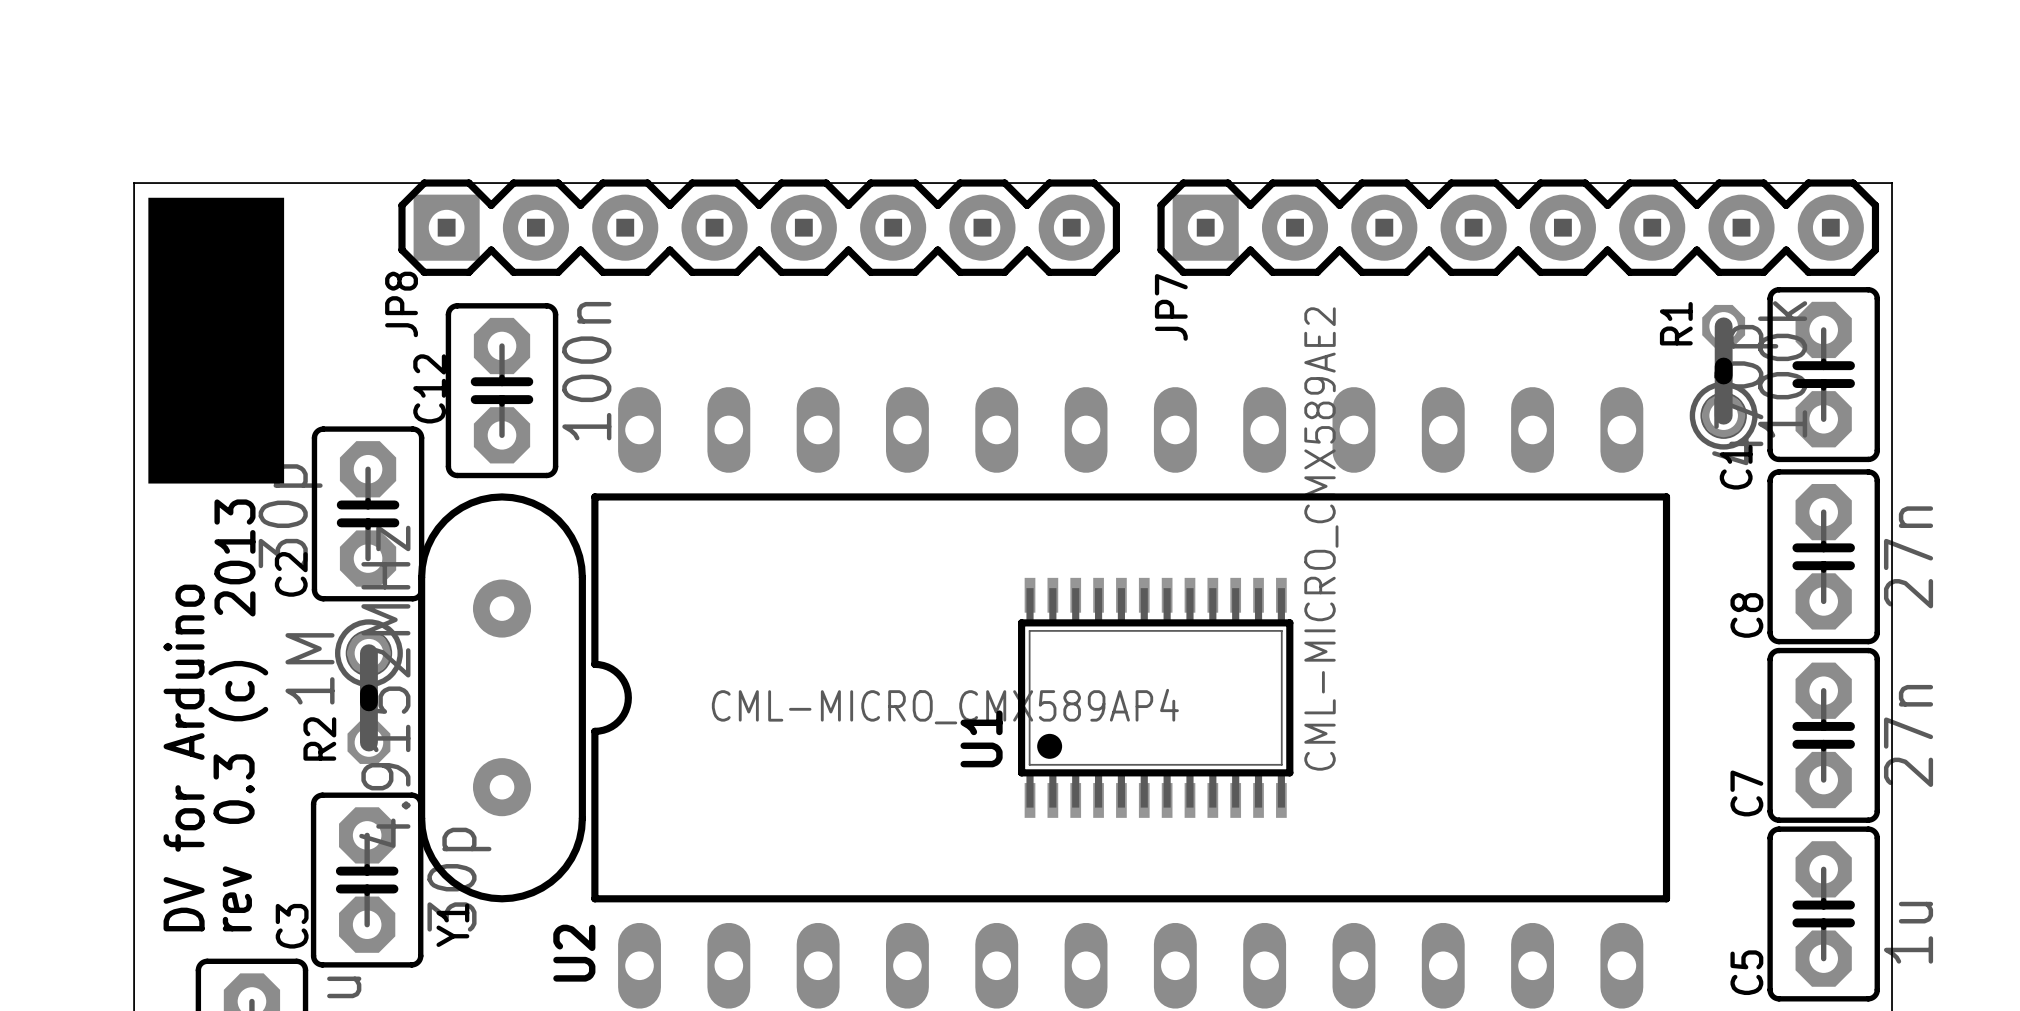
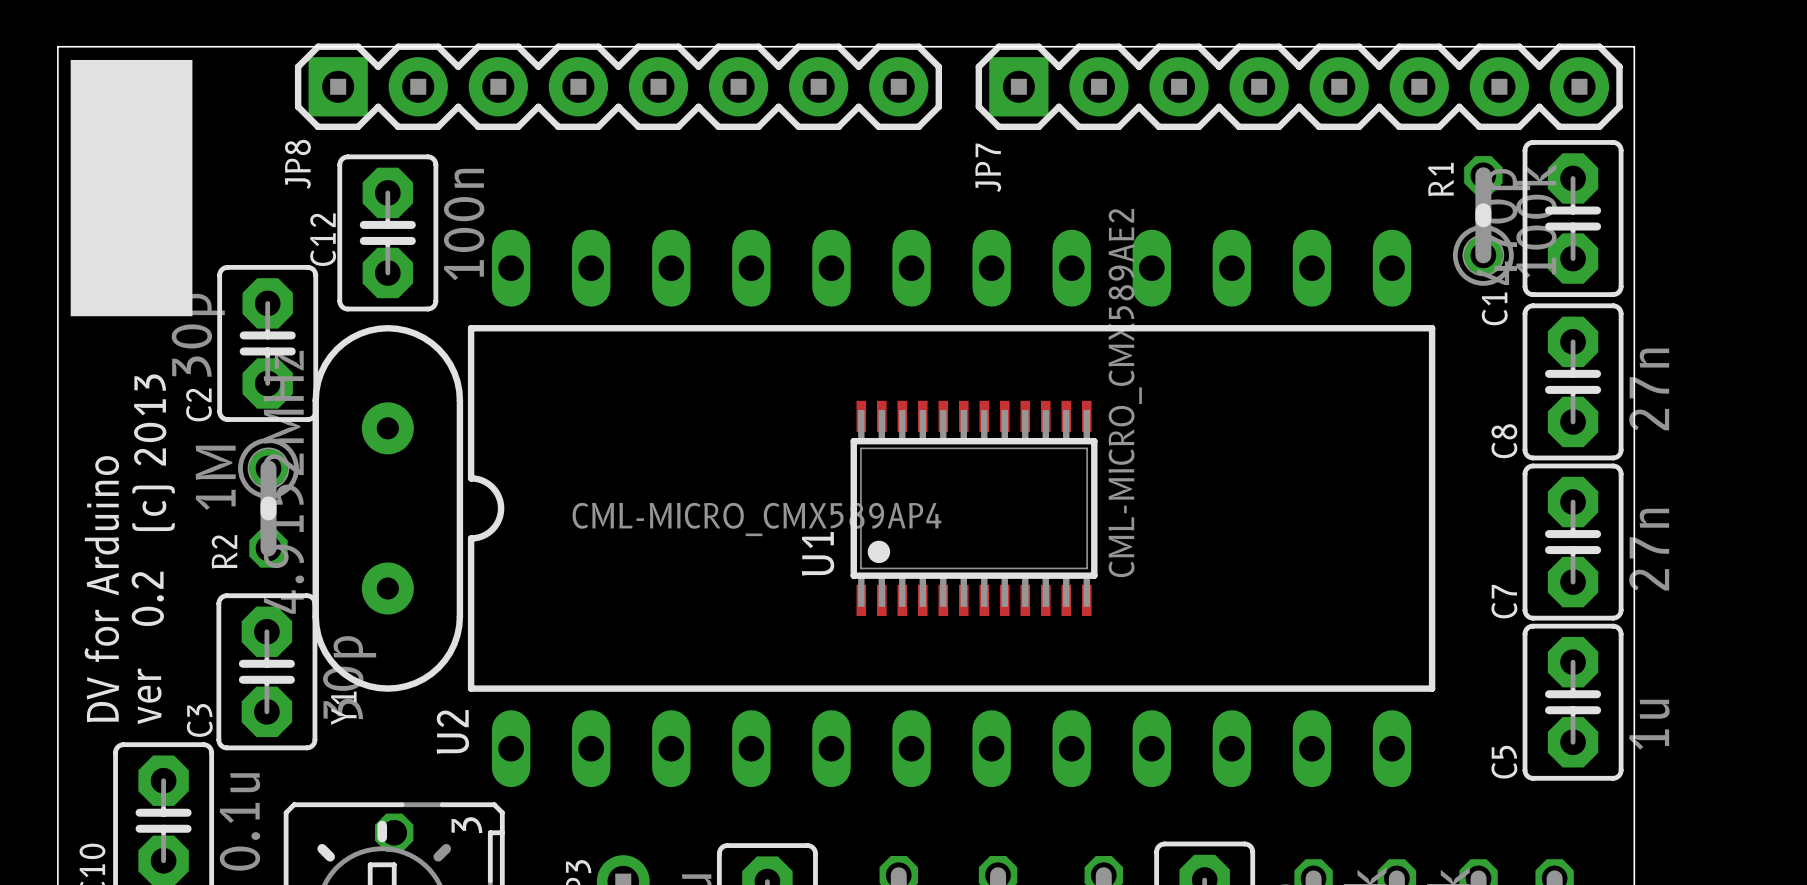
text: 2013 (234, 557) -> (c) 2013 (153, 452)
text: 0.3 (c) (238, 742) -> 0.2 (147, 598)
text: rev (237, 898) -> ver (149, 696)

